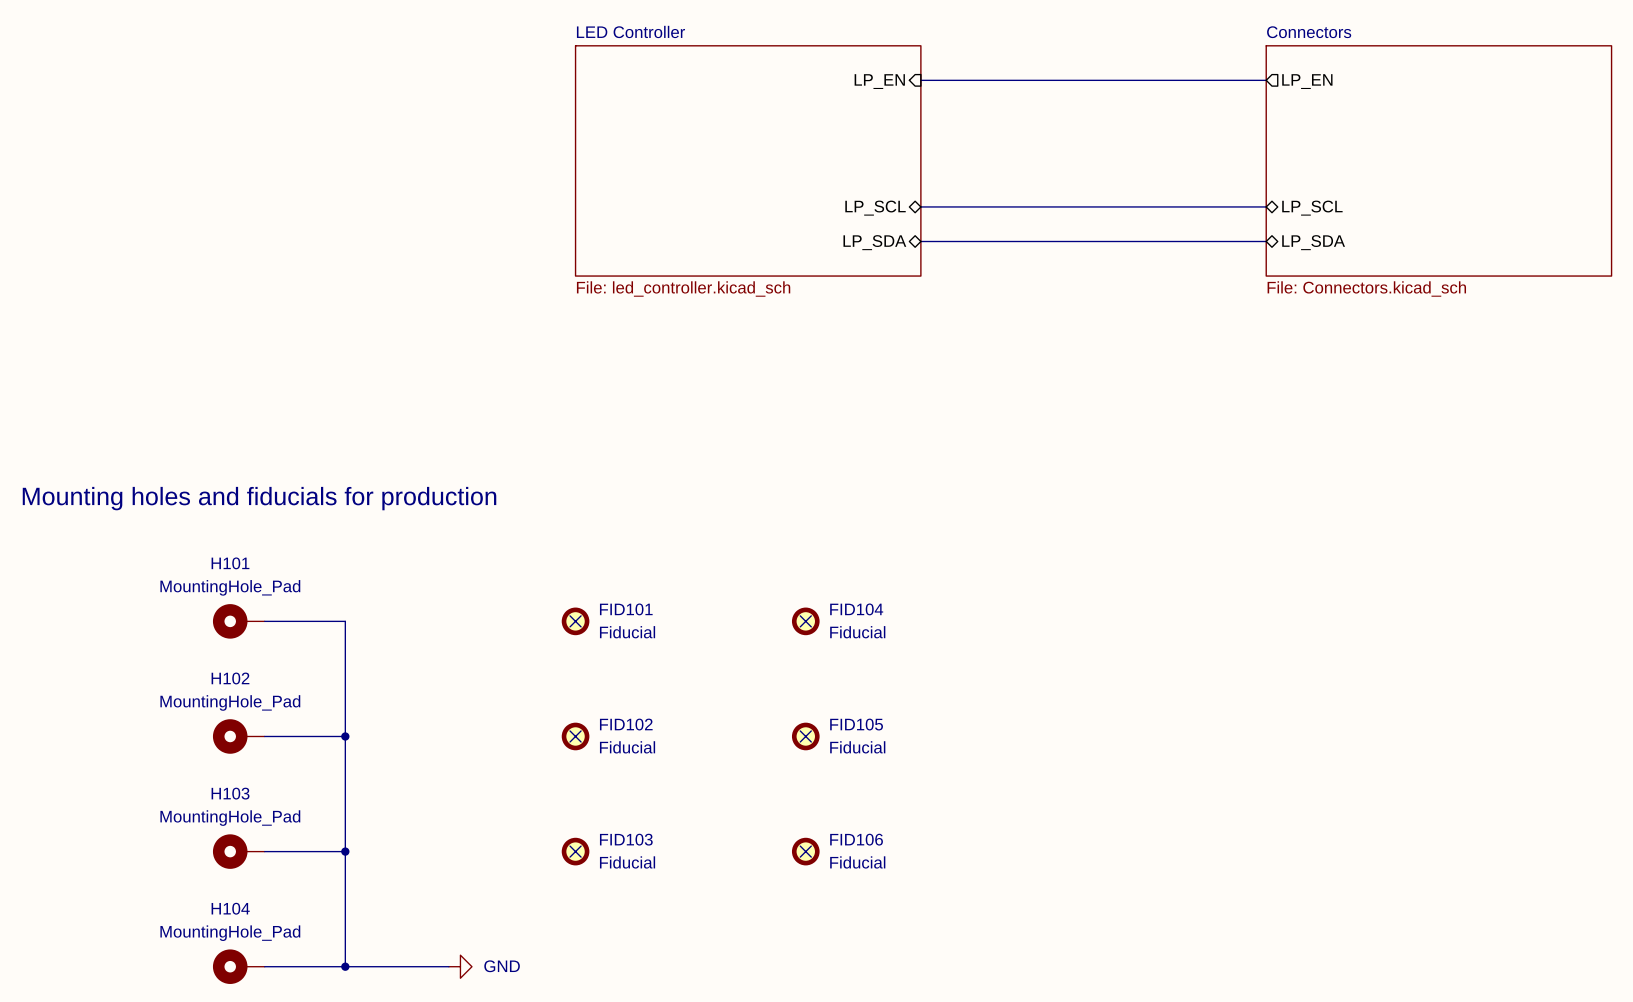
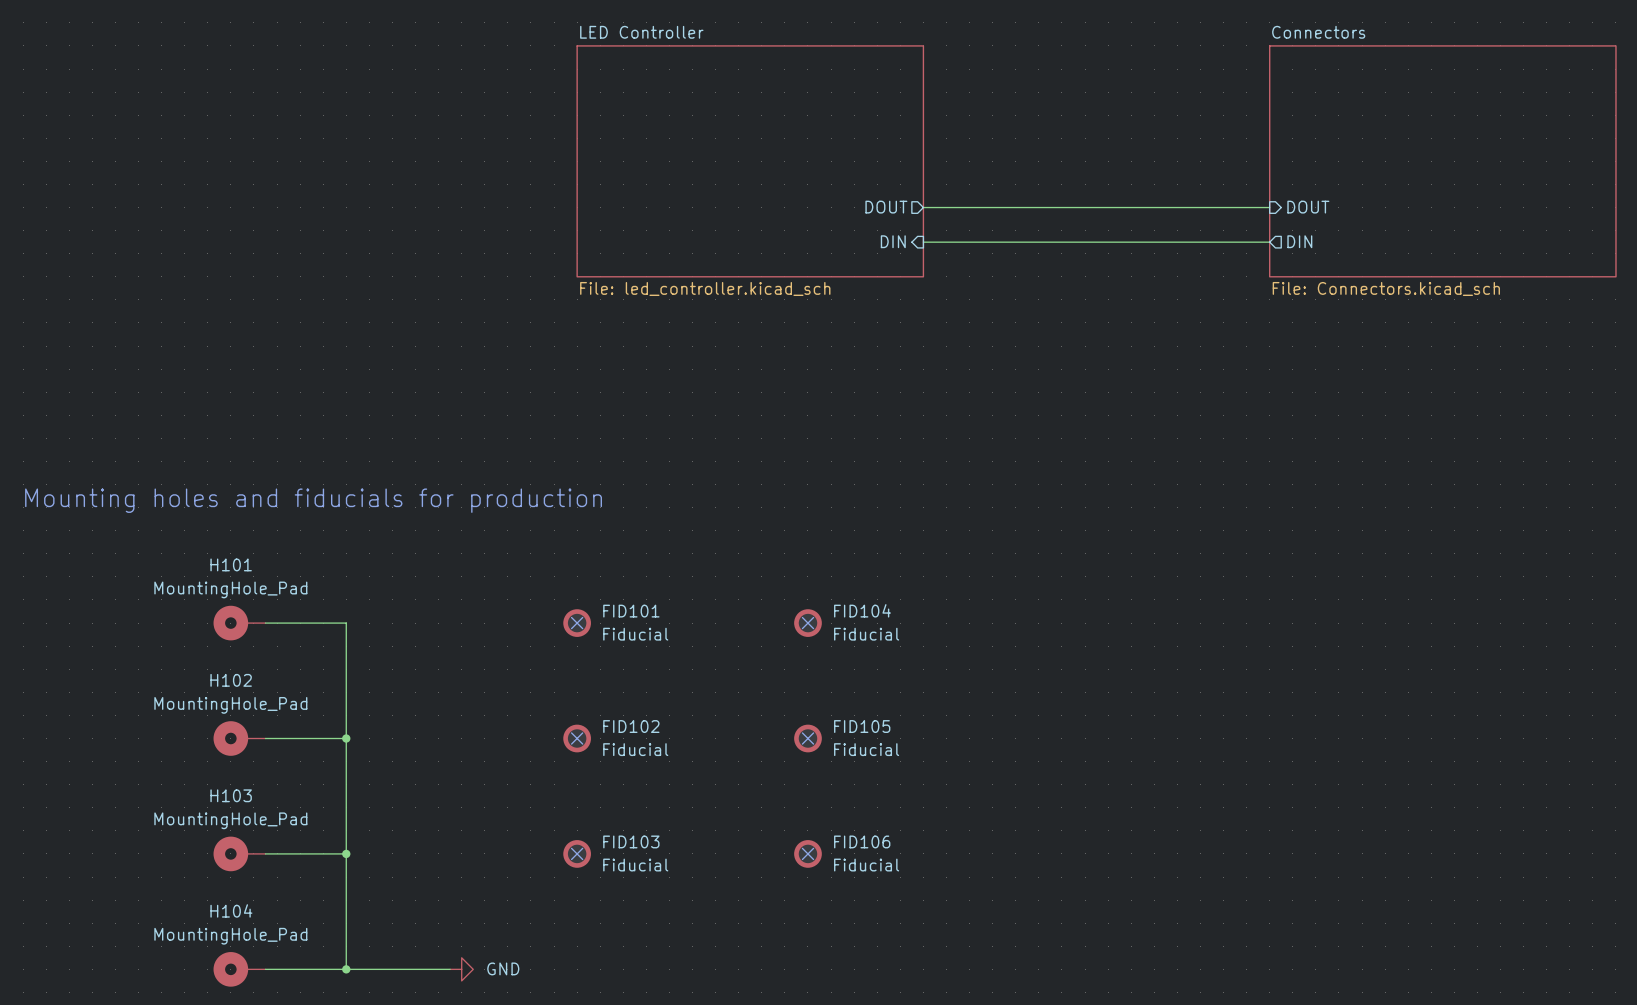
wire: (920, 80) (1266, 80) -> none
sheet pin: LP_EN (879, 81) -> none
sheet pin: LP_EN (1307, 81) -> none
sheet pin shape: bidirectional (875, 208) -> output (886, 207)
sheet pin: LP_SCL (875, 208) -> DOUT (886, 207)
sheet pin shape: bidirectional (1312, 208) -> input (1308, 207)
sheet pin: LP_SCL (1312, 208) -> DOUT (1308, 207)
sheet pin shape: bidirectional (874, 242) -> input (893, 241)
sheet pin: LP_SDA (874, 242) -> DIN (893, 241)
sheet pin shape: bidirectional (1313, 242) -> output (1299, 241)
sheet pin: LP_SDA (1313, 242) -> DIN (1299, 241)

